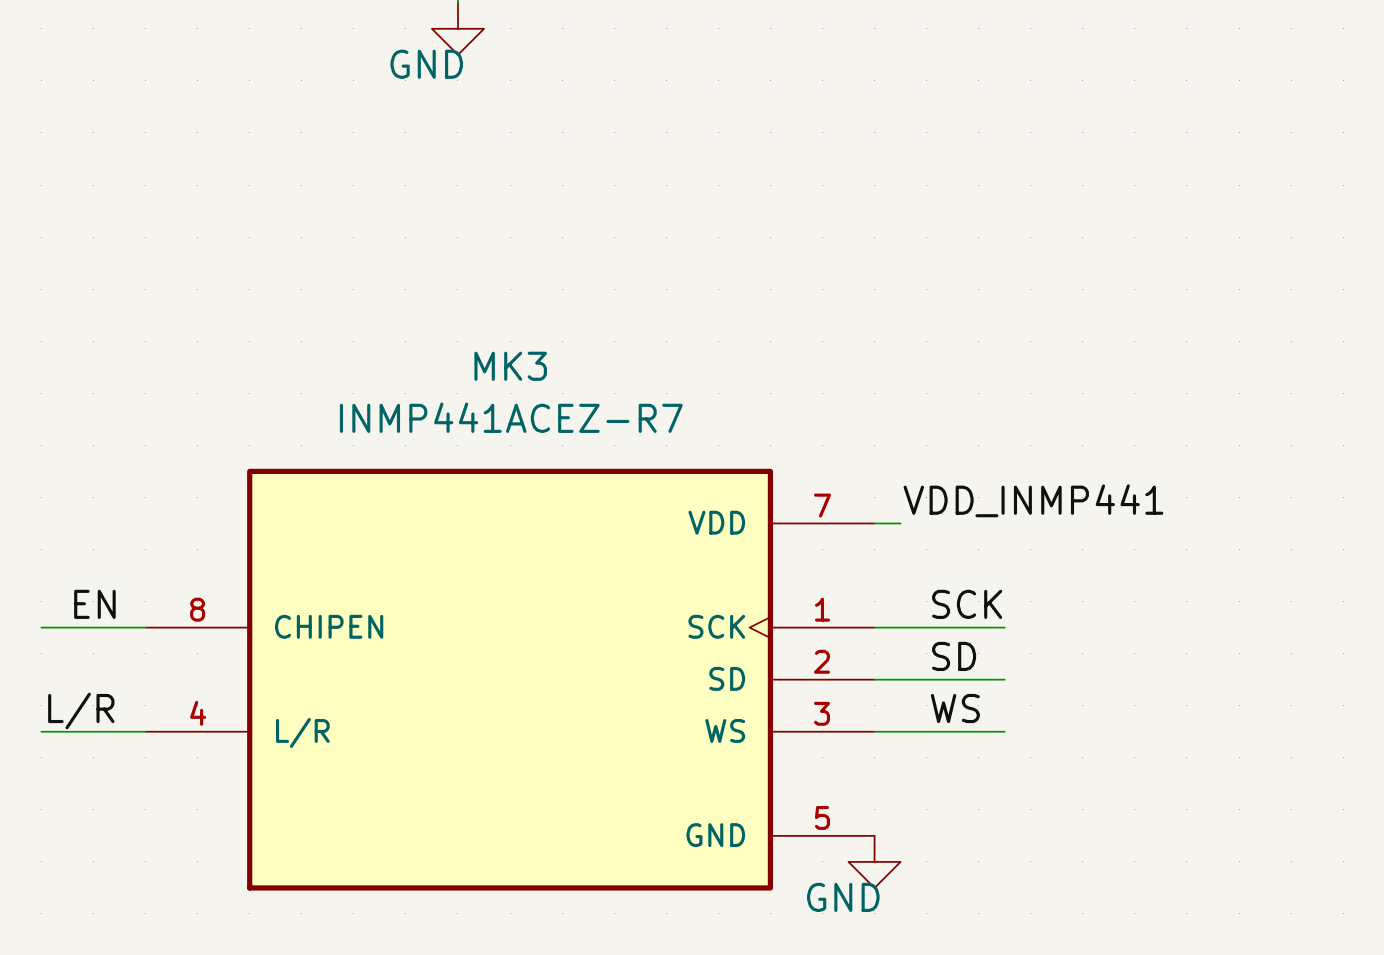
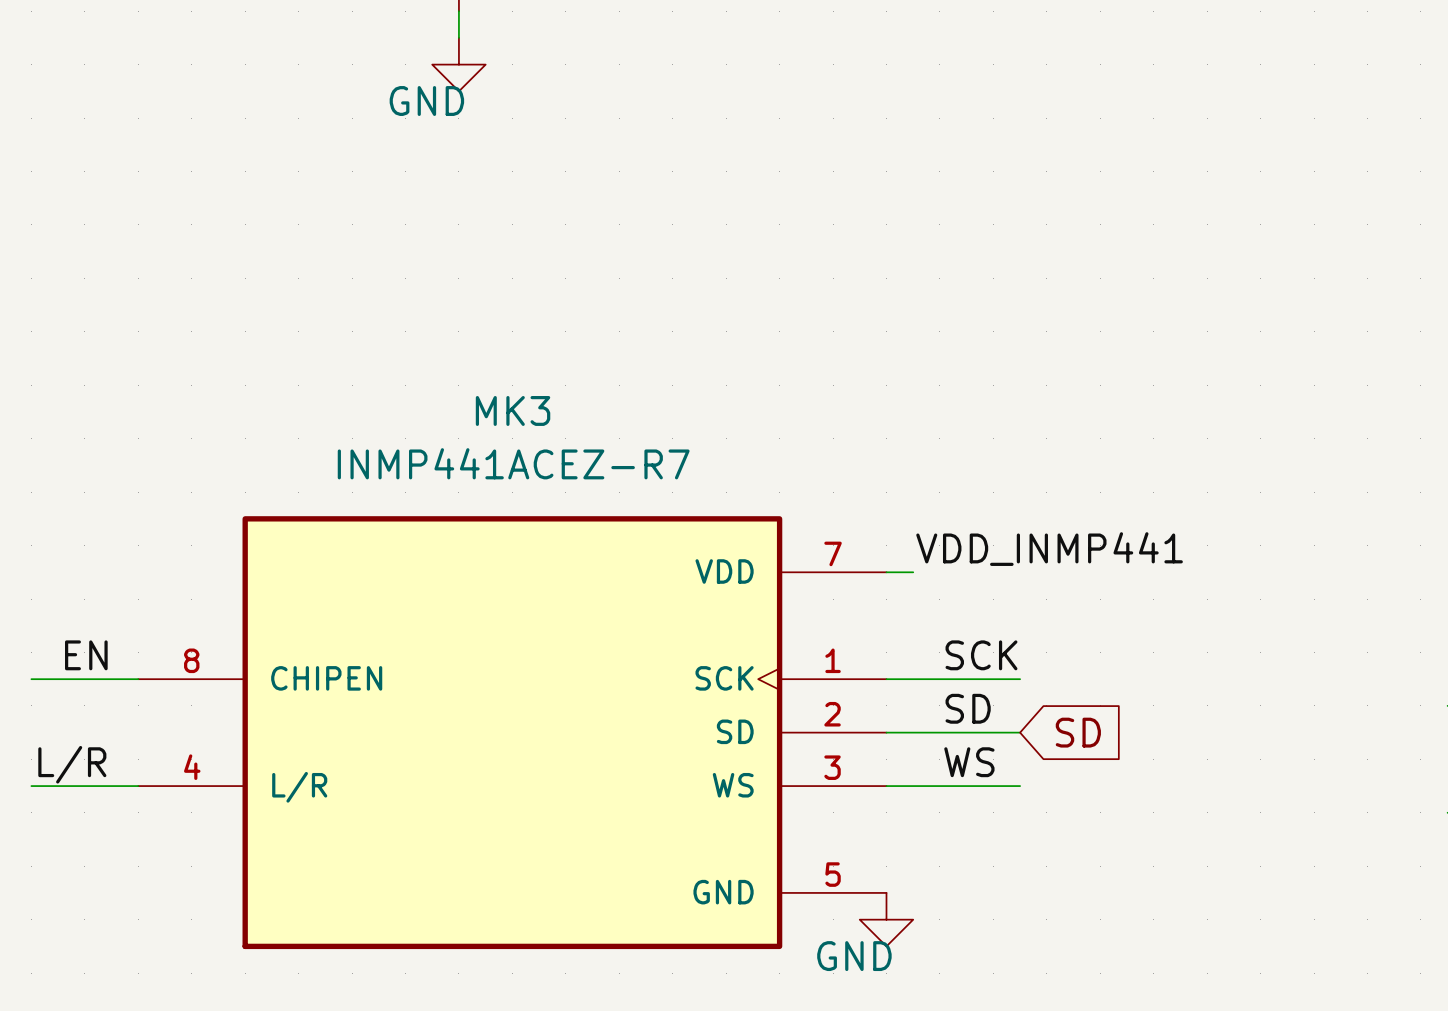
global label: none -> SD (1078, 732)

